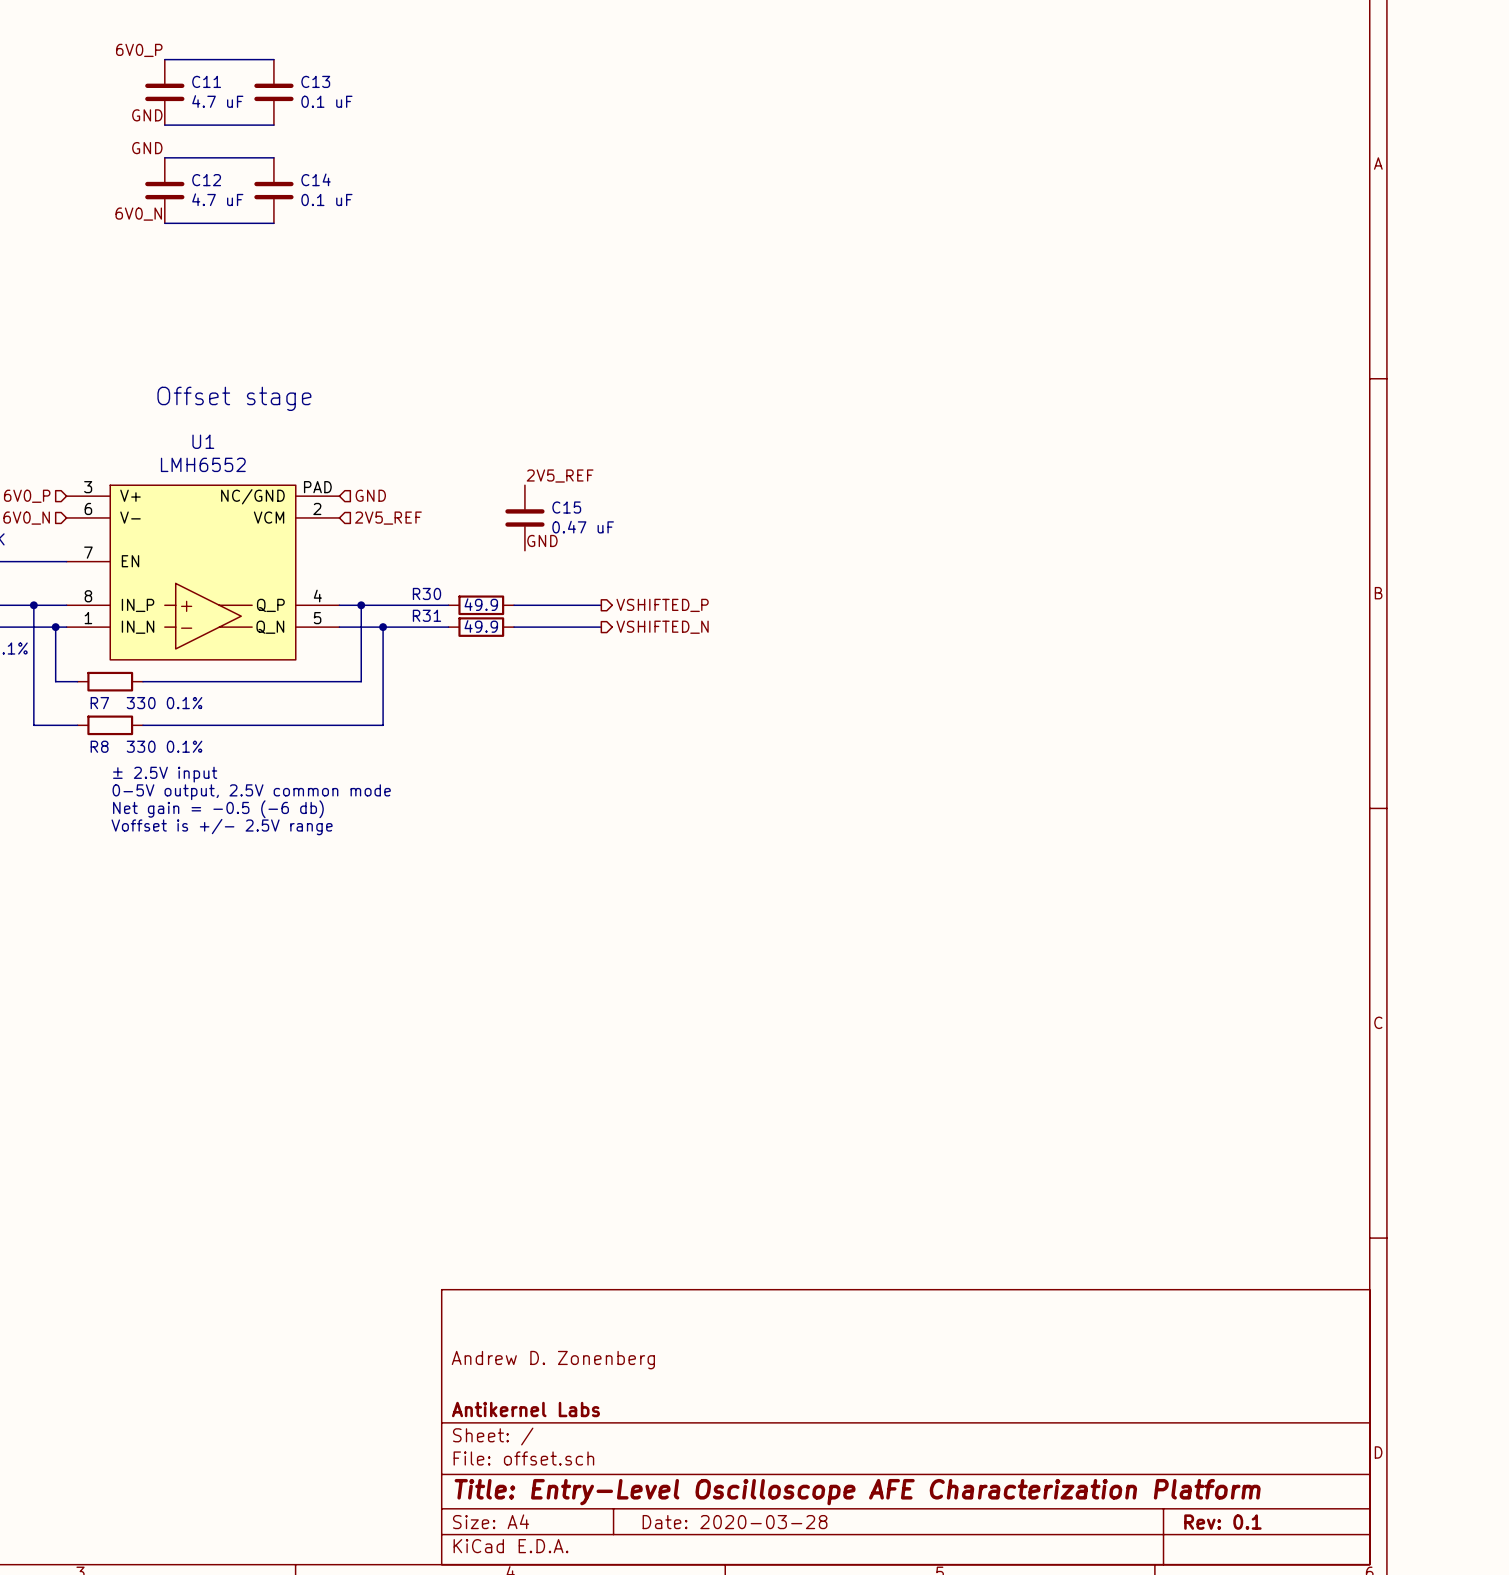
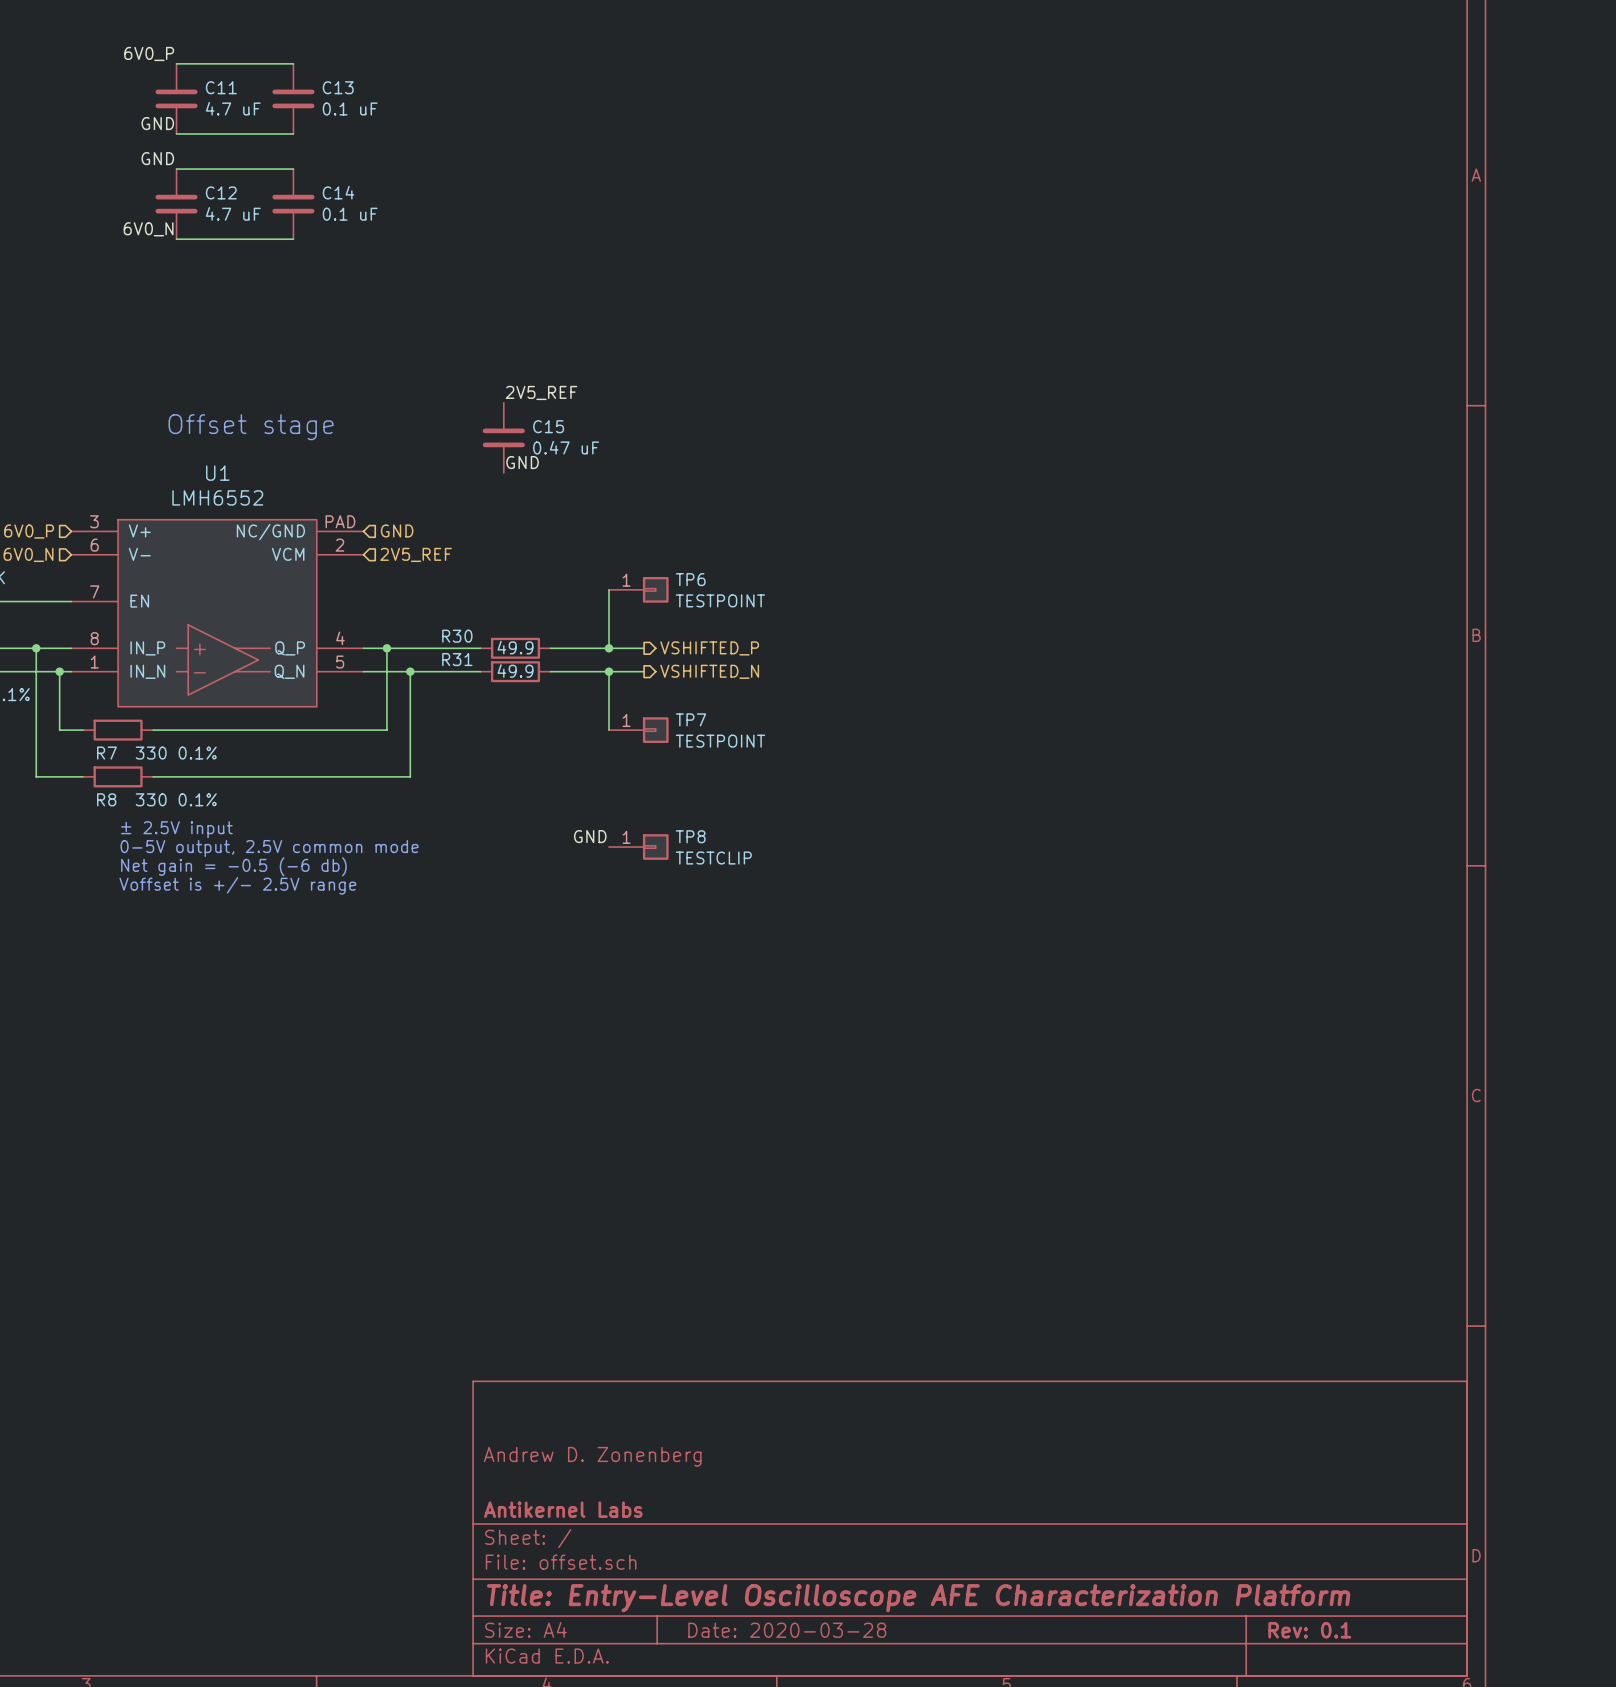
label: none -> GND (522, 462)
label position: 2V5_REF (560, 476) -> 2V5_REF (541, 392)
C15 position: (524, 517) -> (503, 437)
label: GND (542, 540) -> none
wire: none -> (609, 589) (609, 648)
TP6: none -> TESTPOINT (638, 589)
junction: none -> (609, 648)
wire: none -> (609, 671) (609, 730)
junction: none -> (609, 671)
TP7: none -> TESTPOINT (638, 730)
label: none -> GND (590, 836)
TP8: none -> TESTCLIP (638, 847)

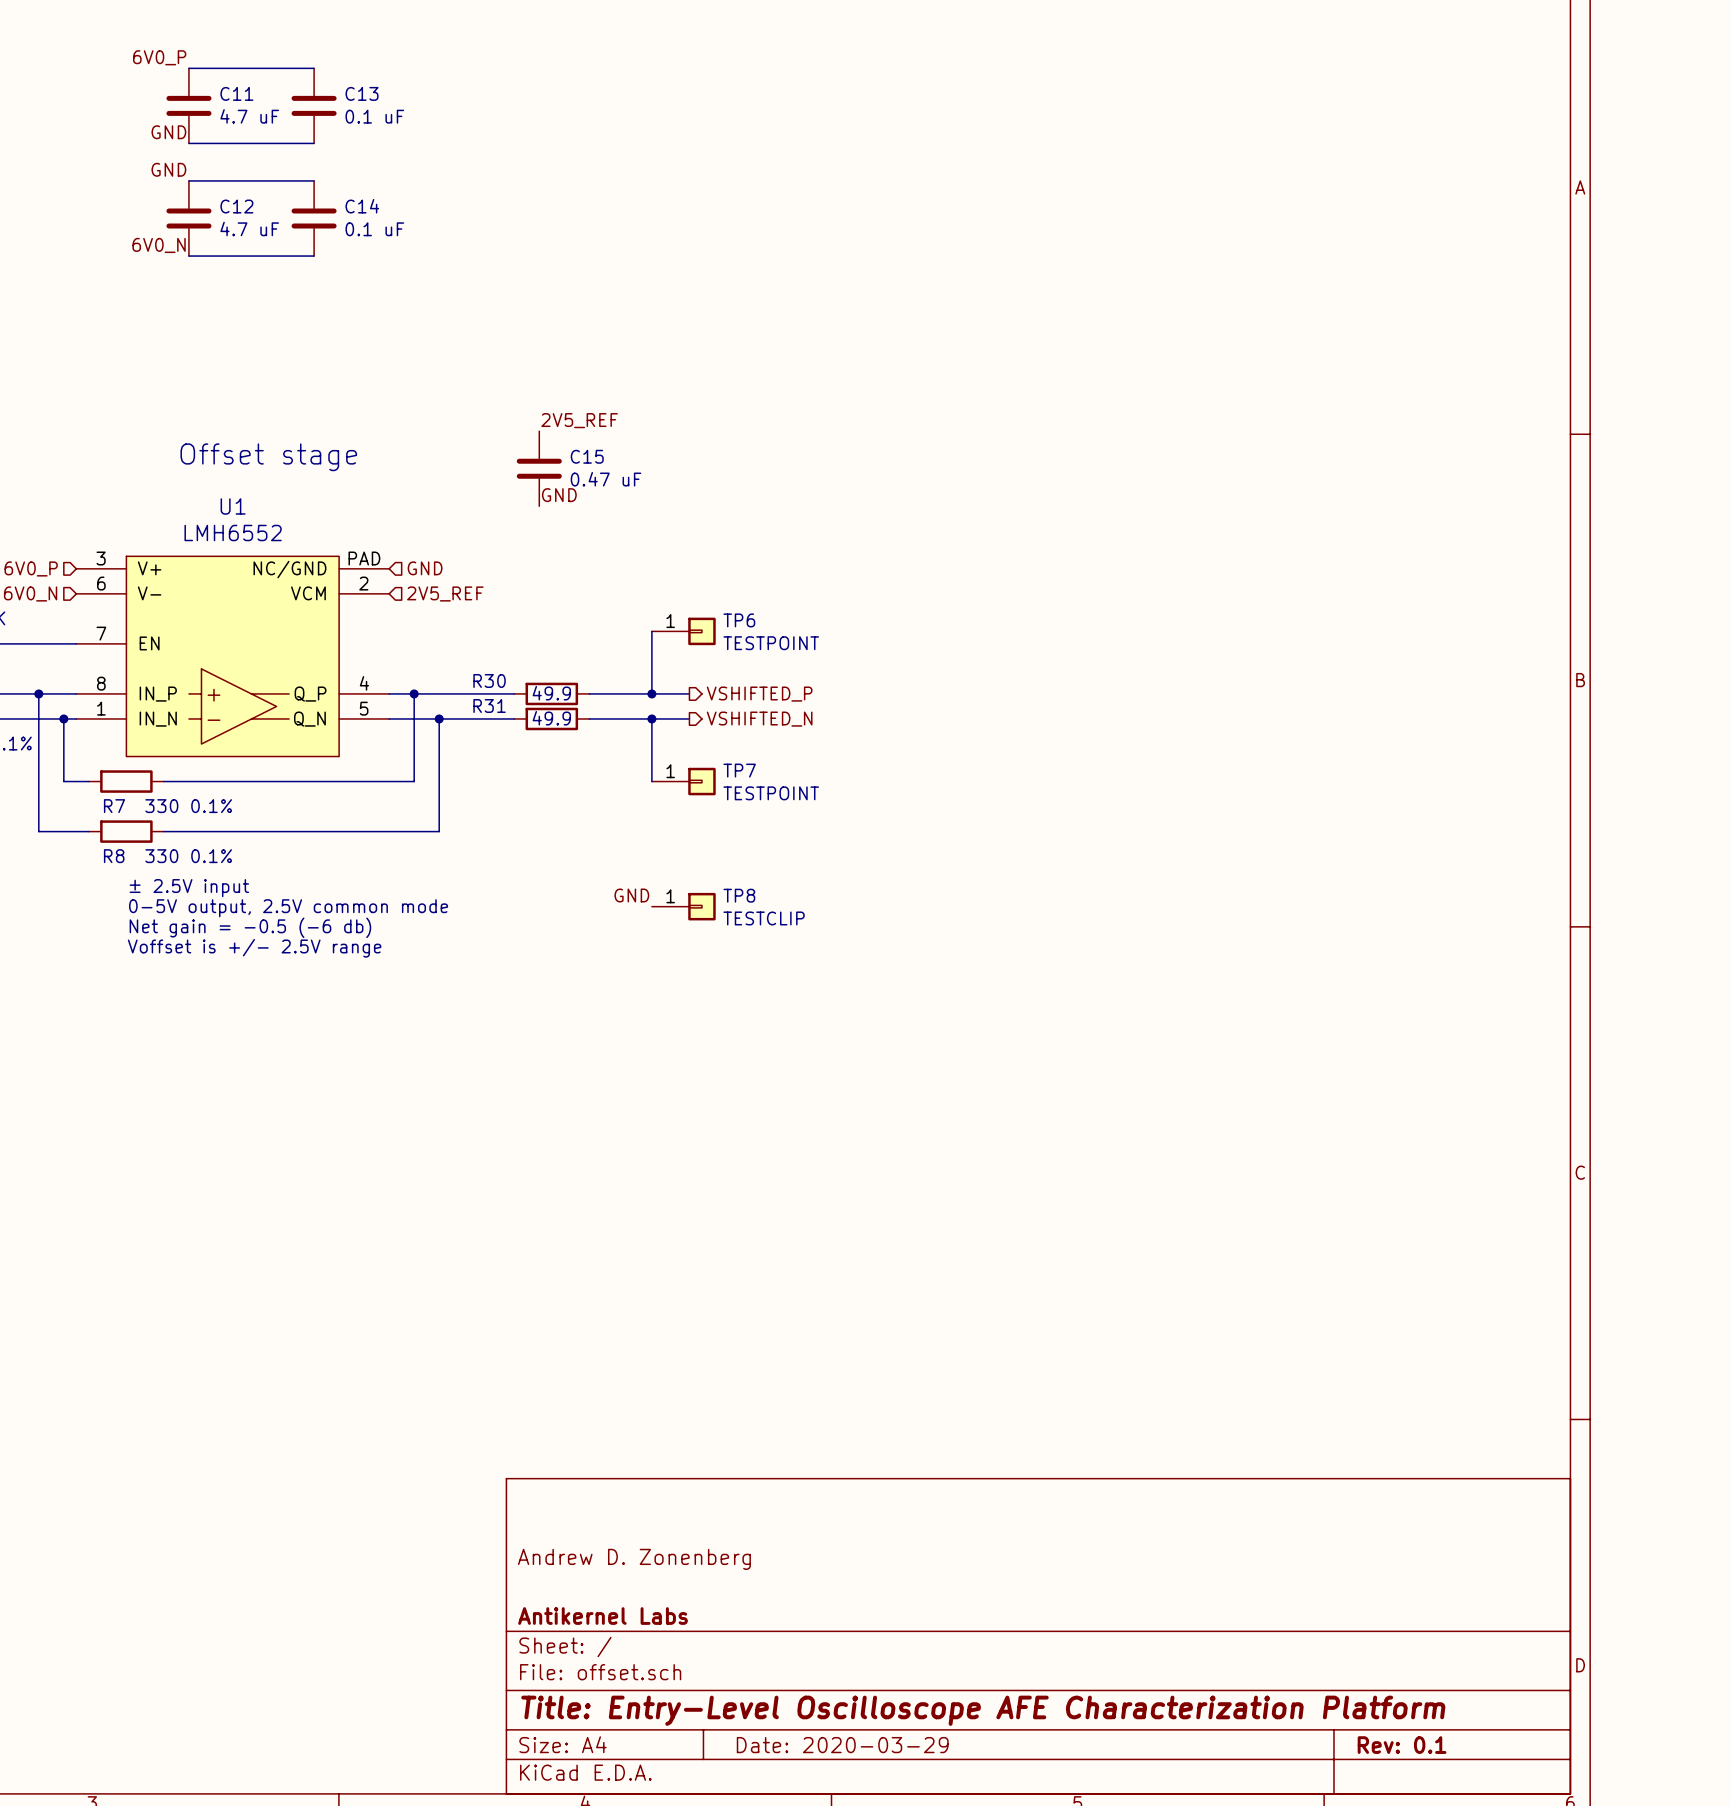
title block: Date: 2020-03-28 (787, 1630) -> Date: 2020-03-29 (842, 1745)

